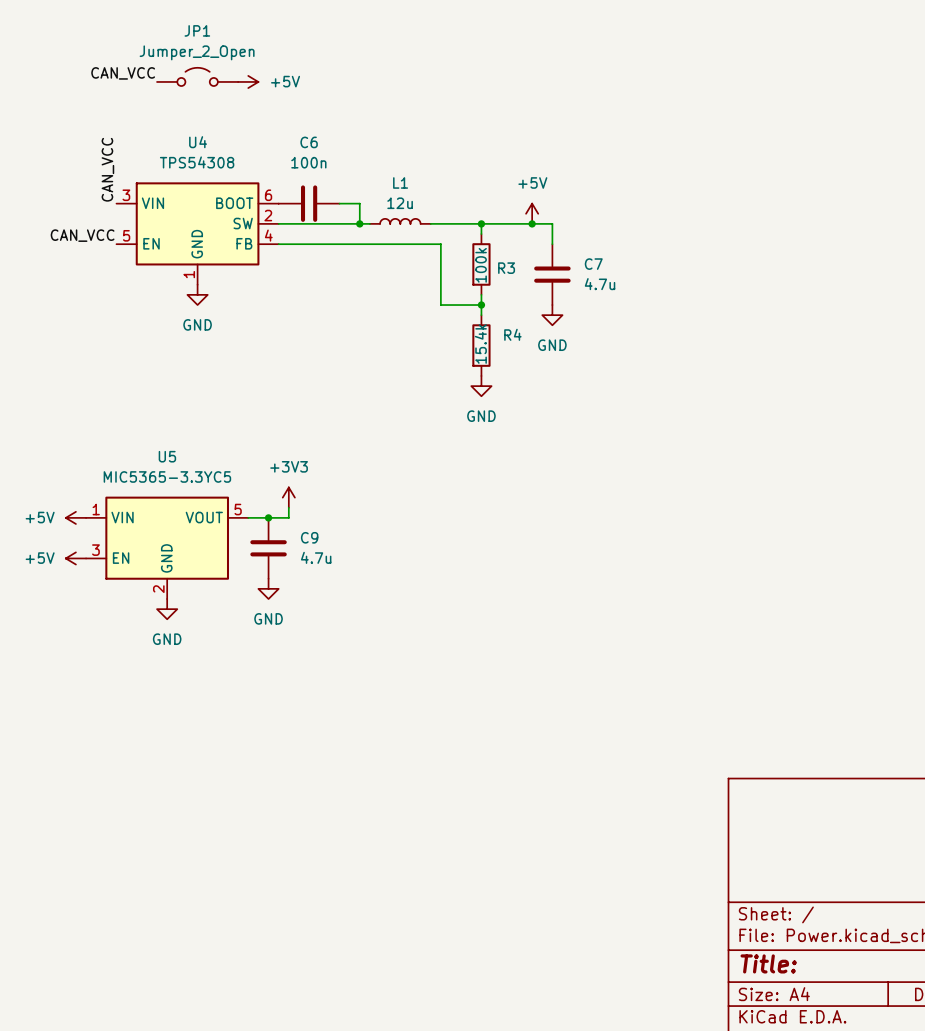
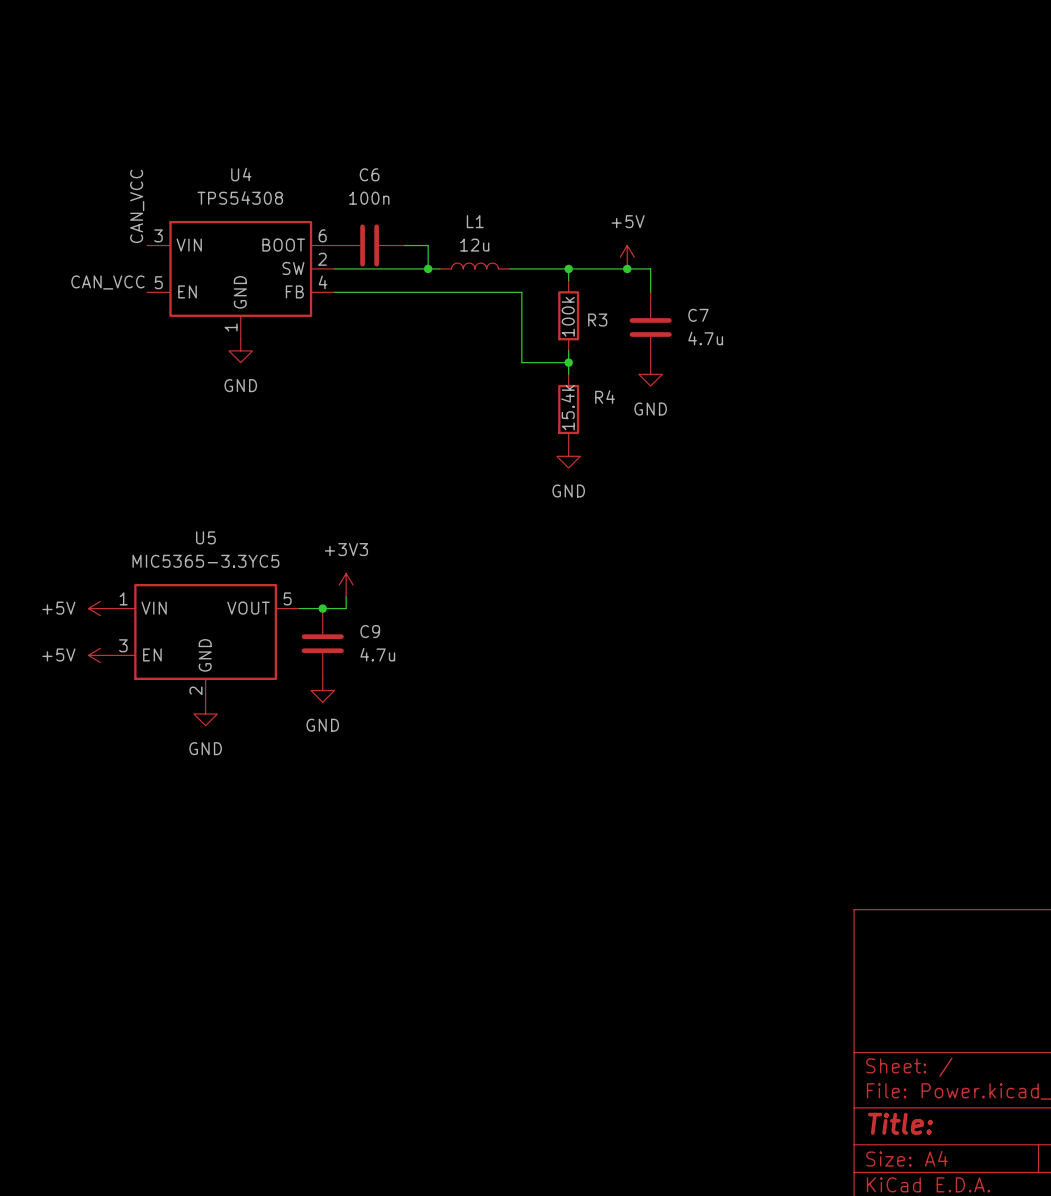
label: CAN_VCC (123, 73) -> none
JP1: Jumper_2_Open (197, 76) -> none
power symbol: +5V (248, 81) -> none

